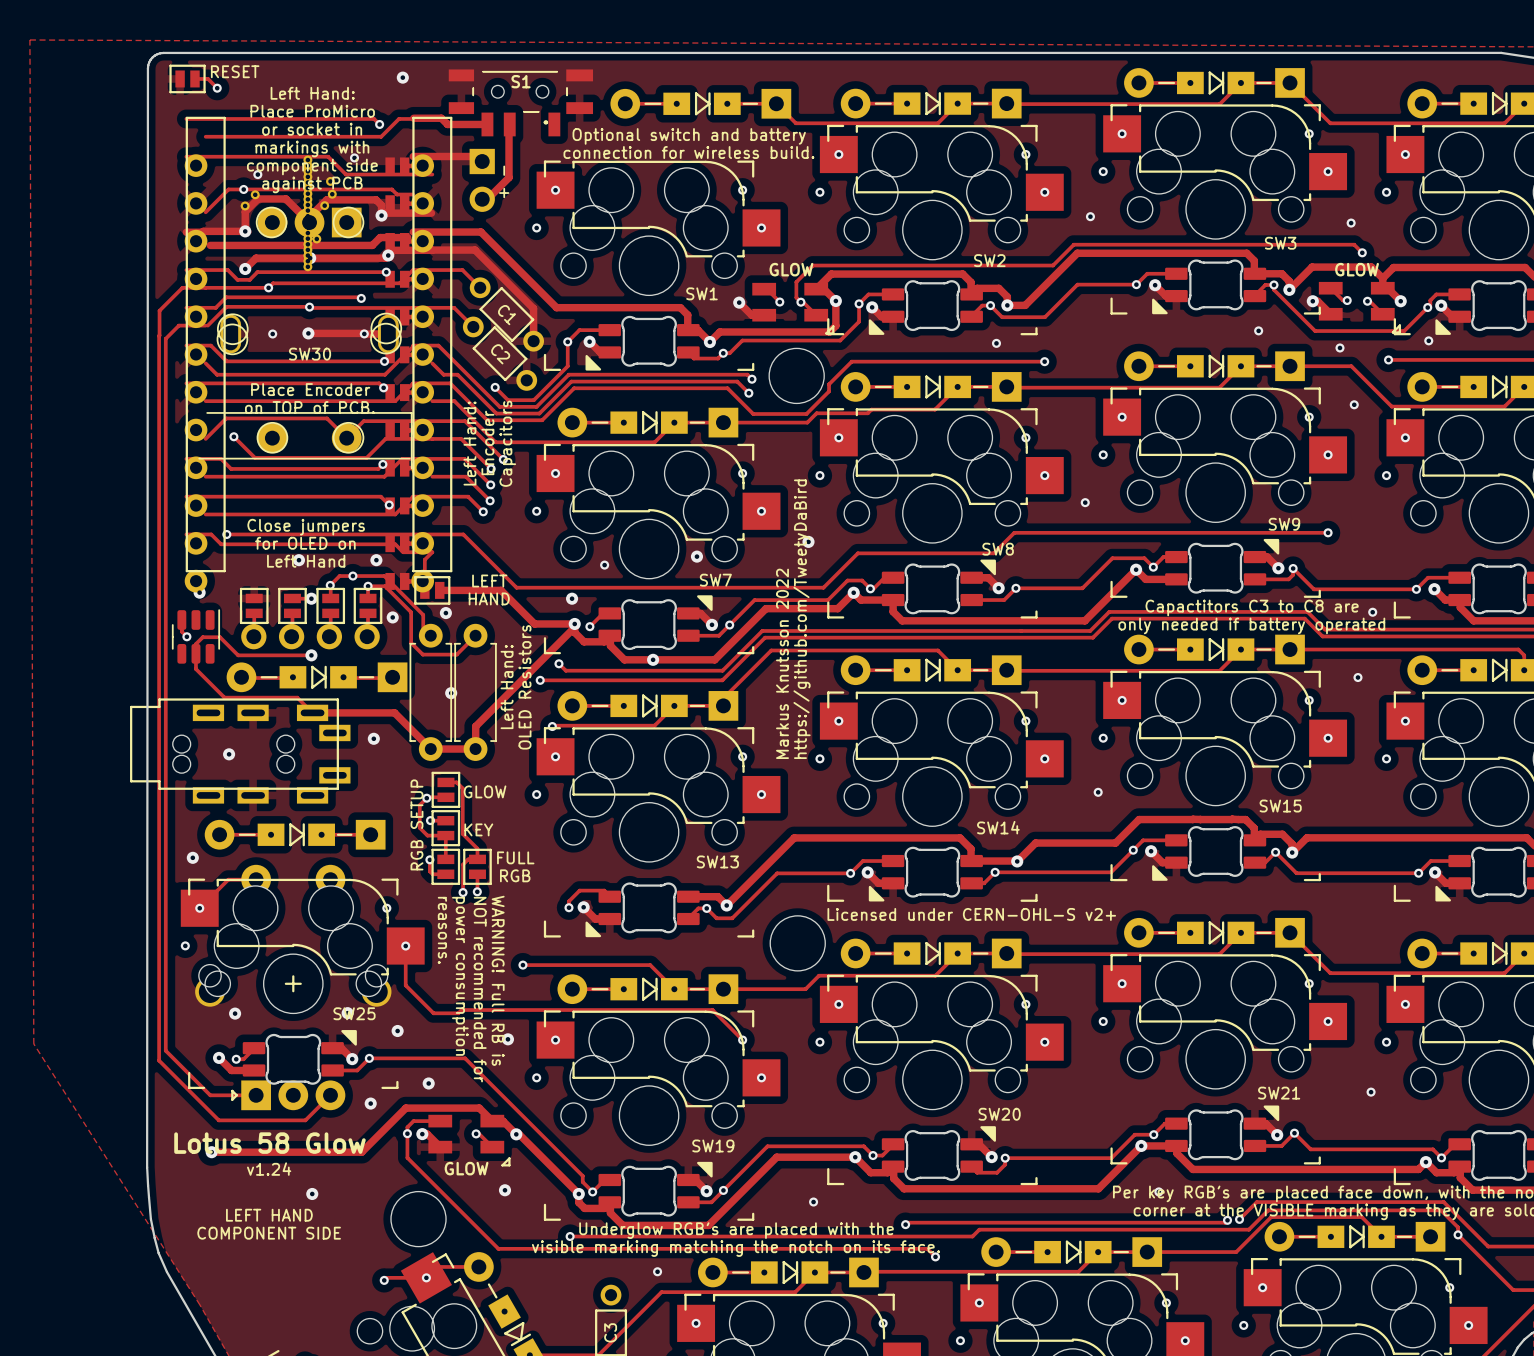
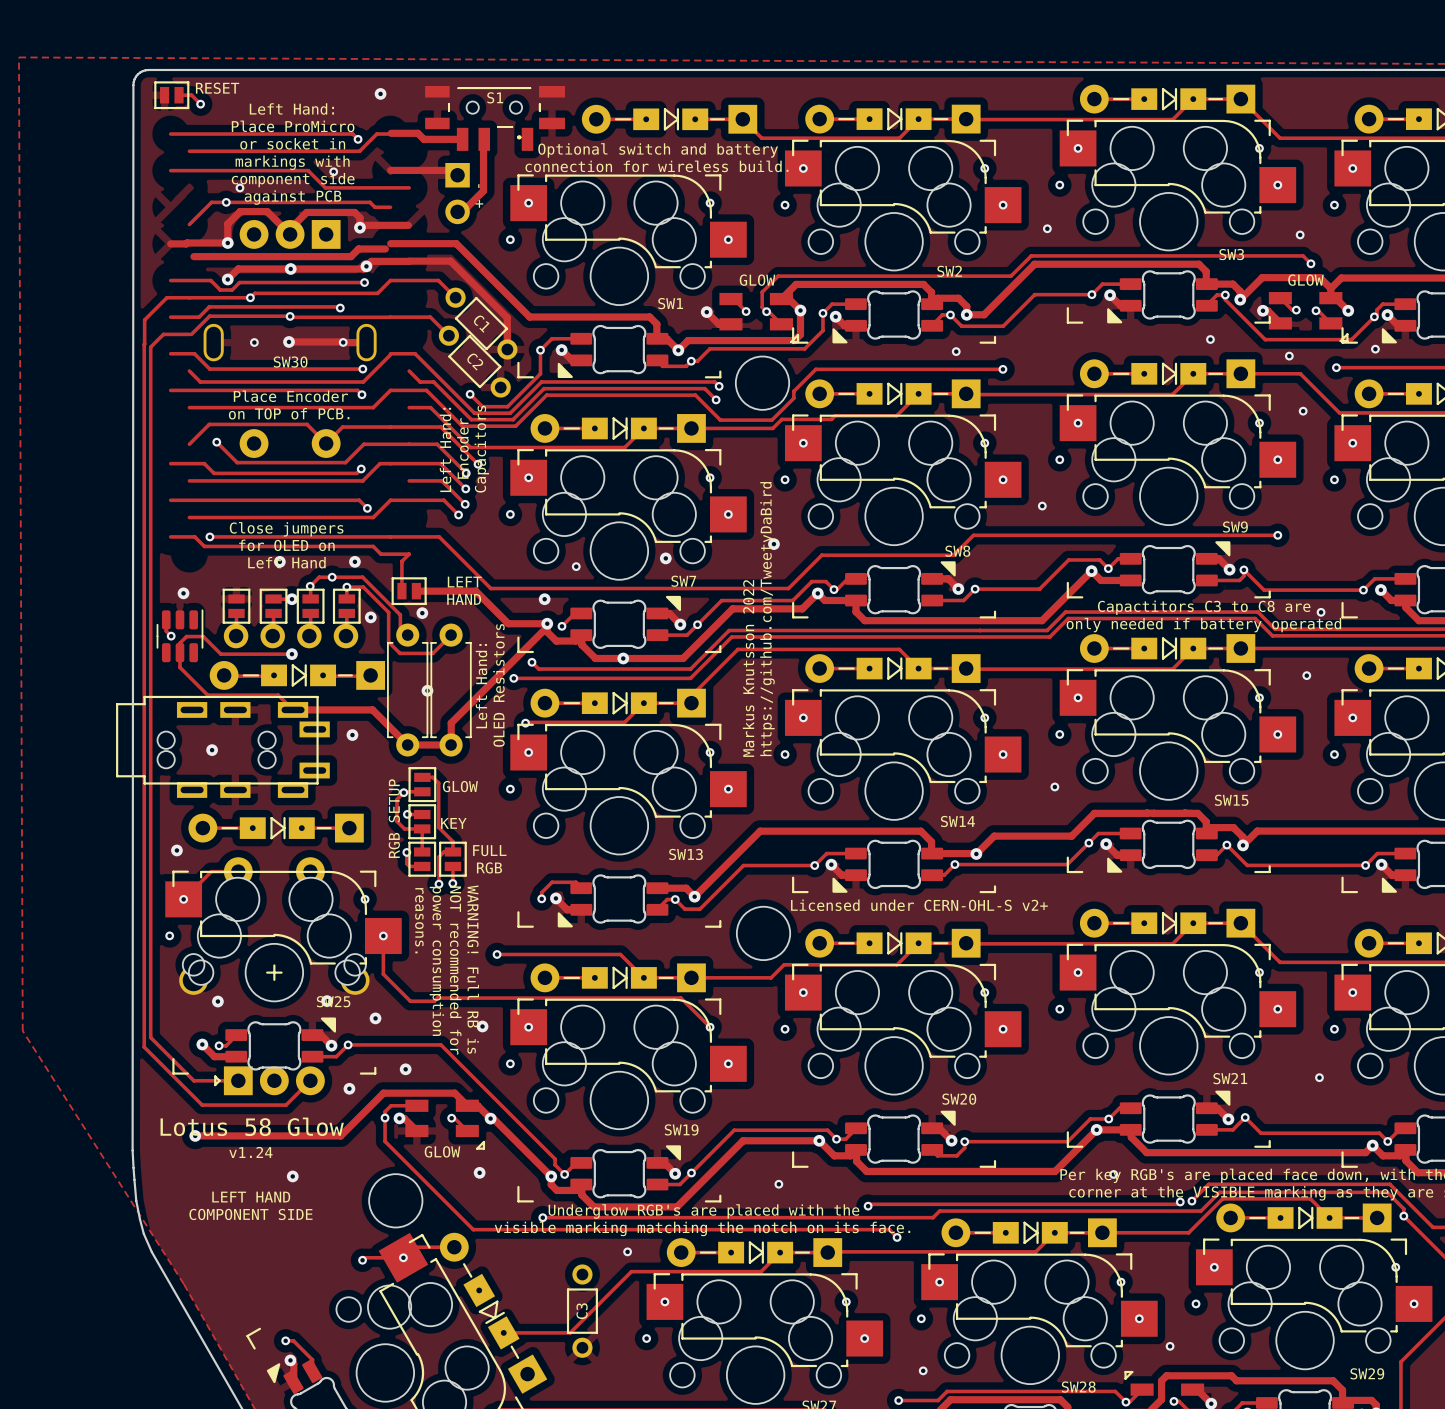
part: (318, 354) -> none

